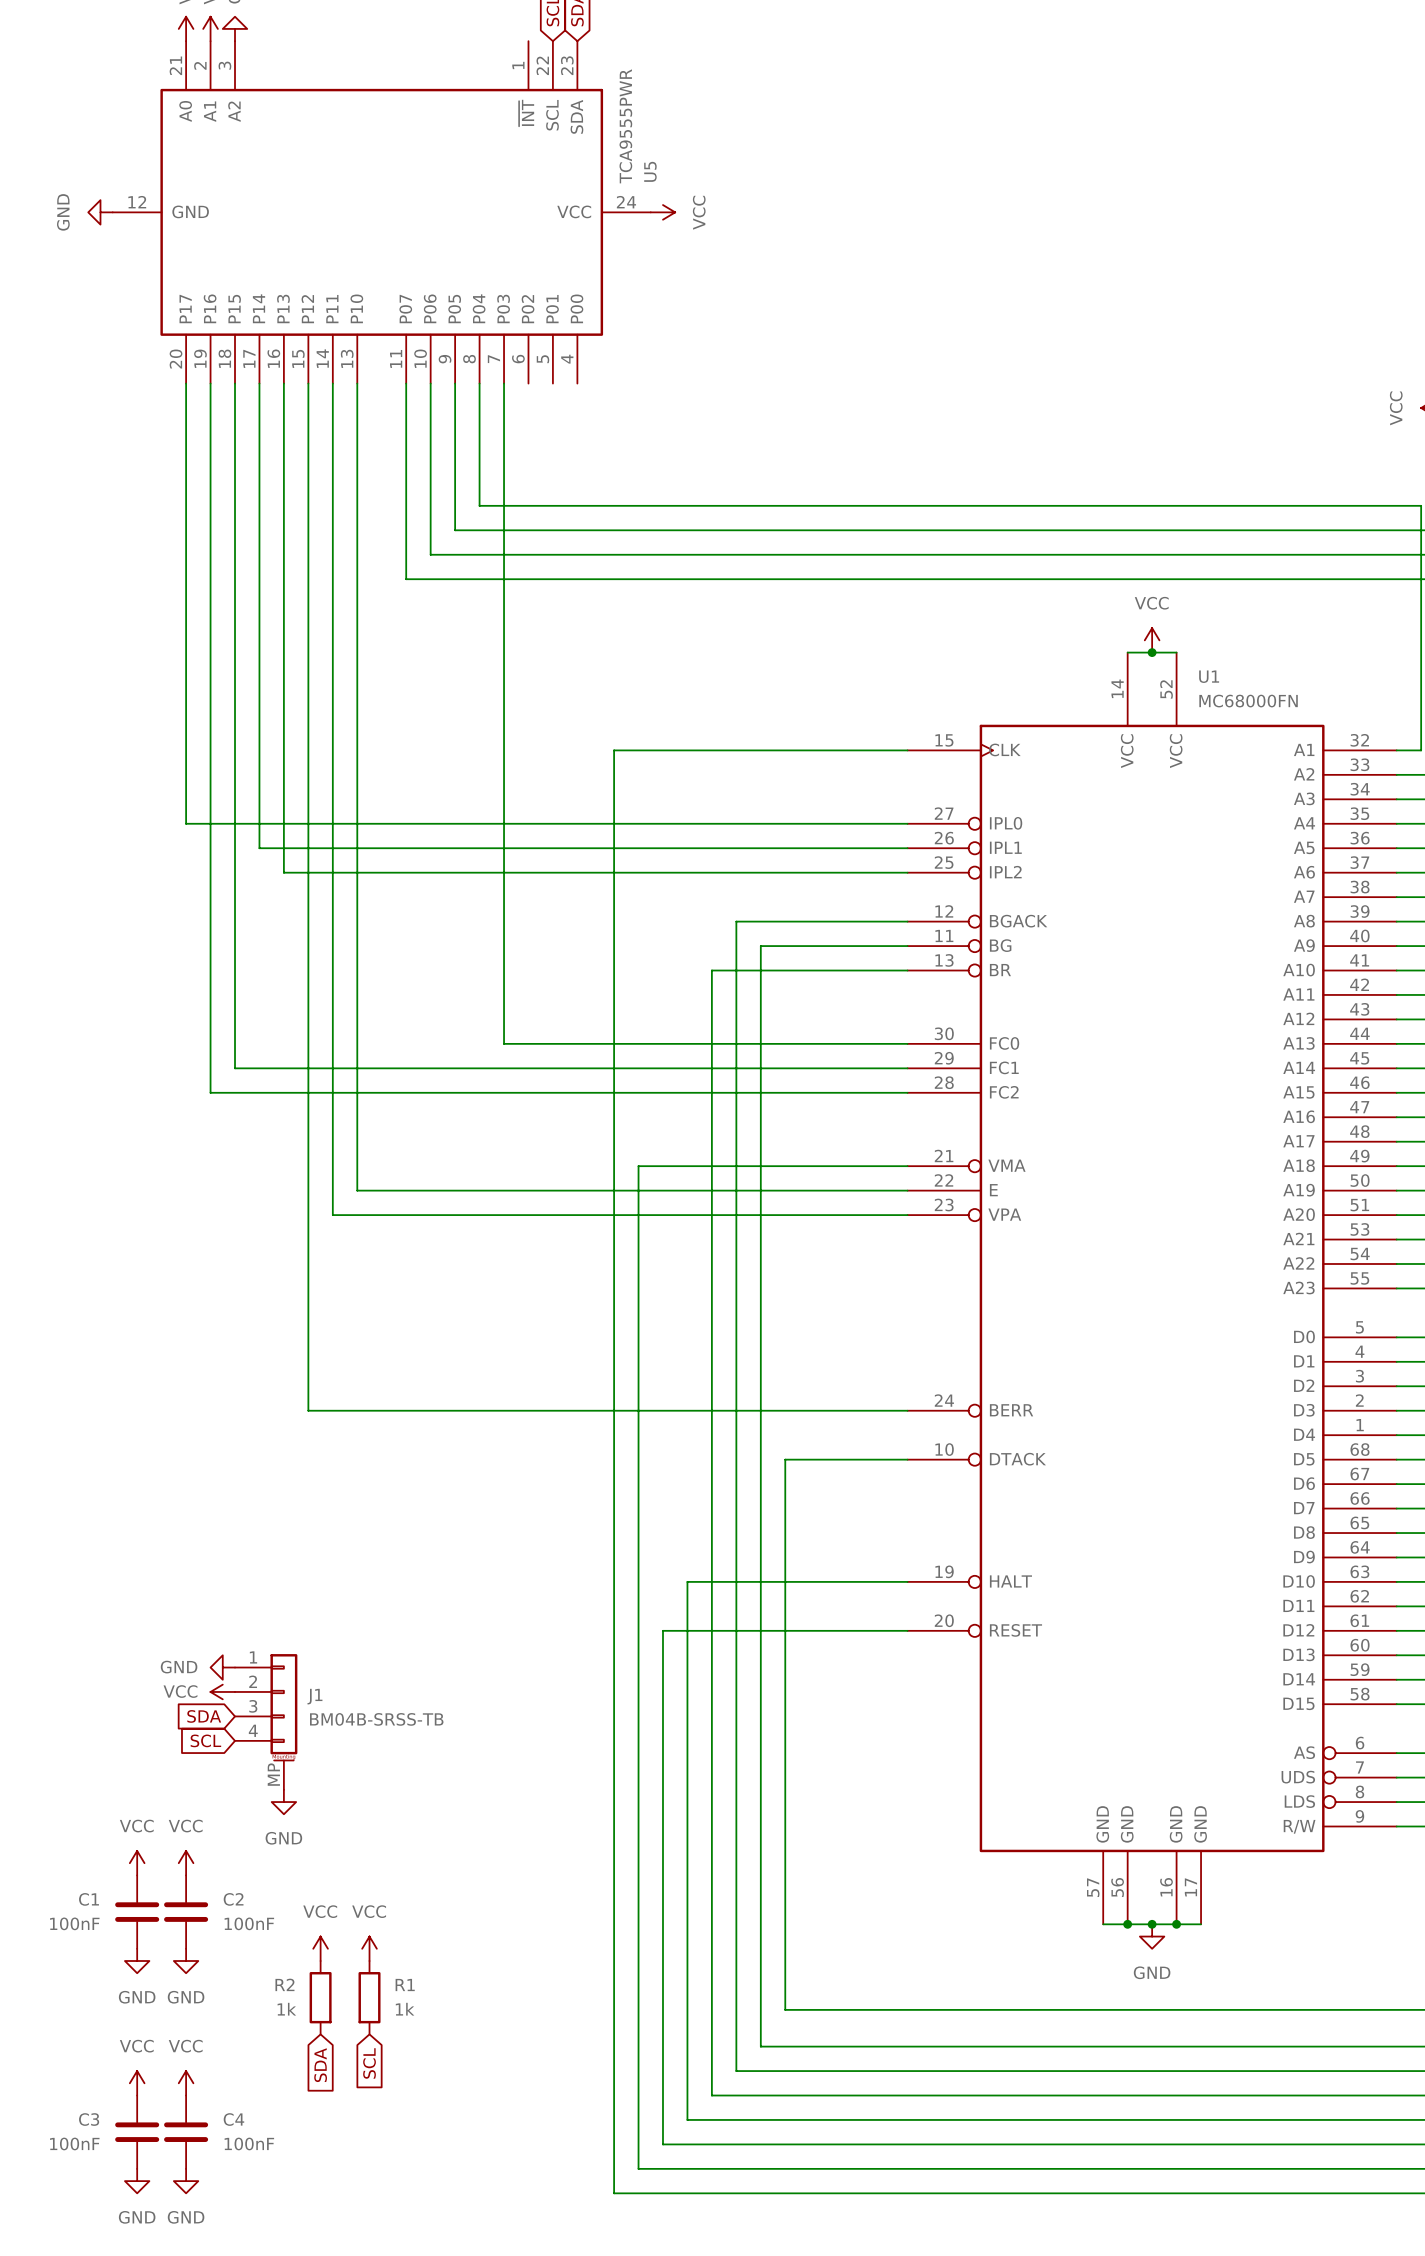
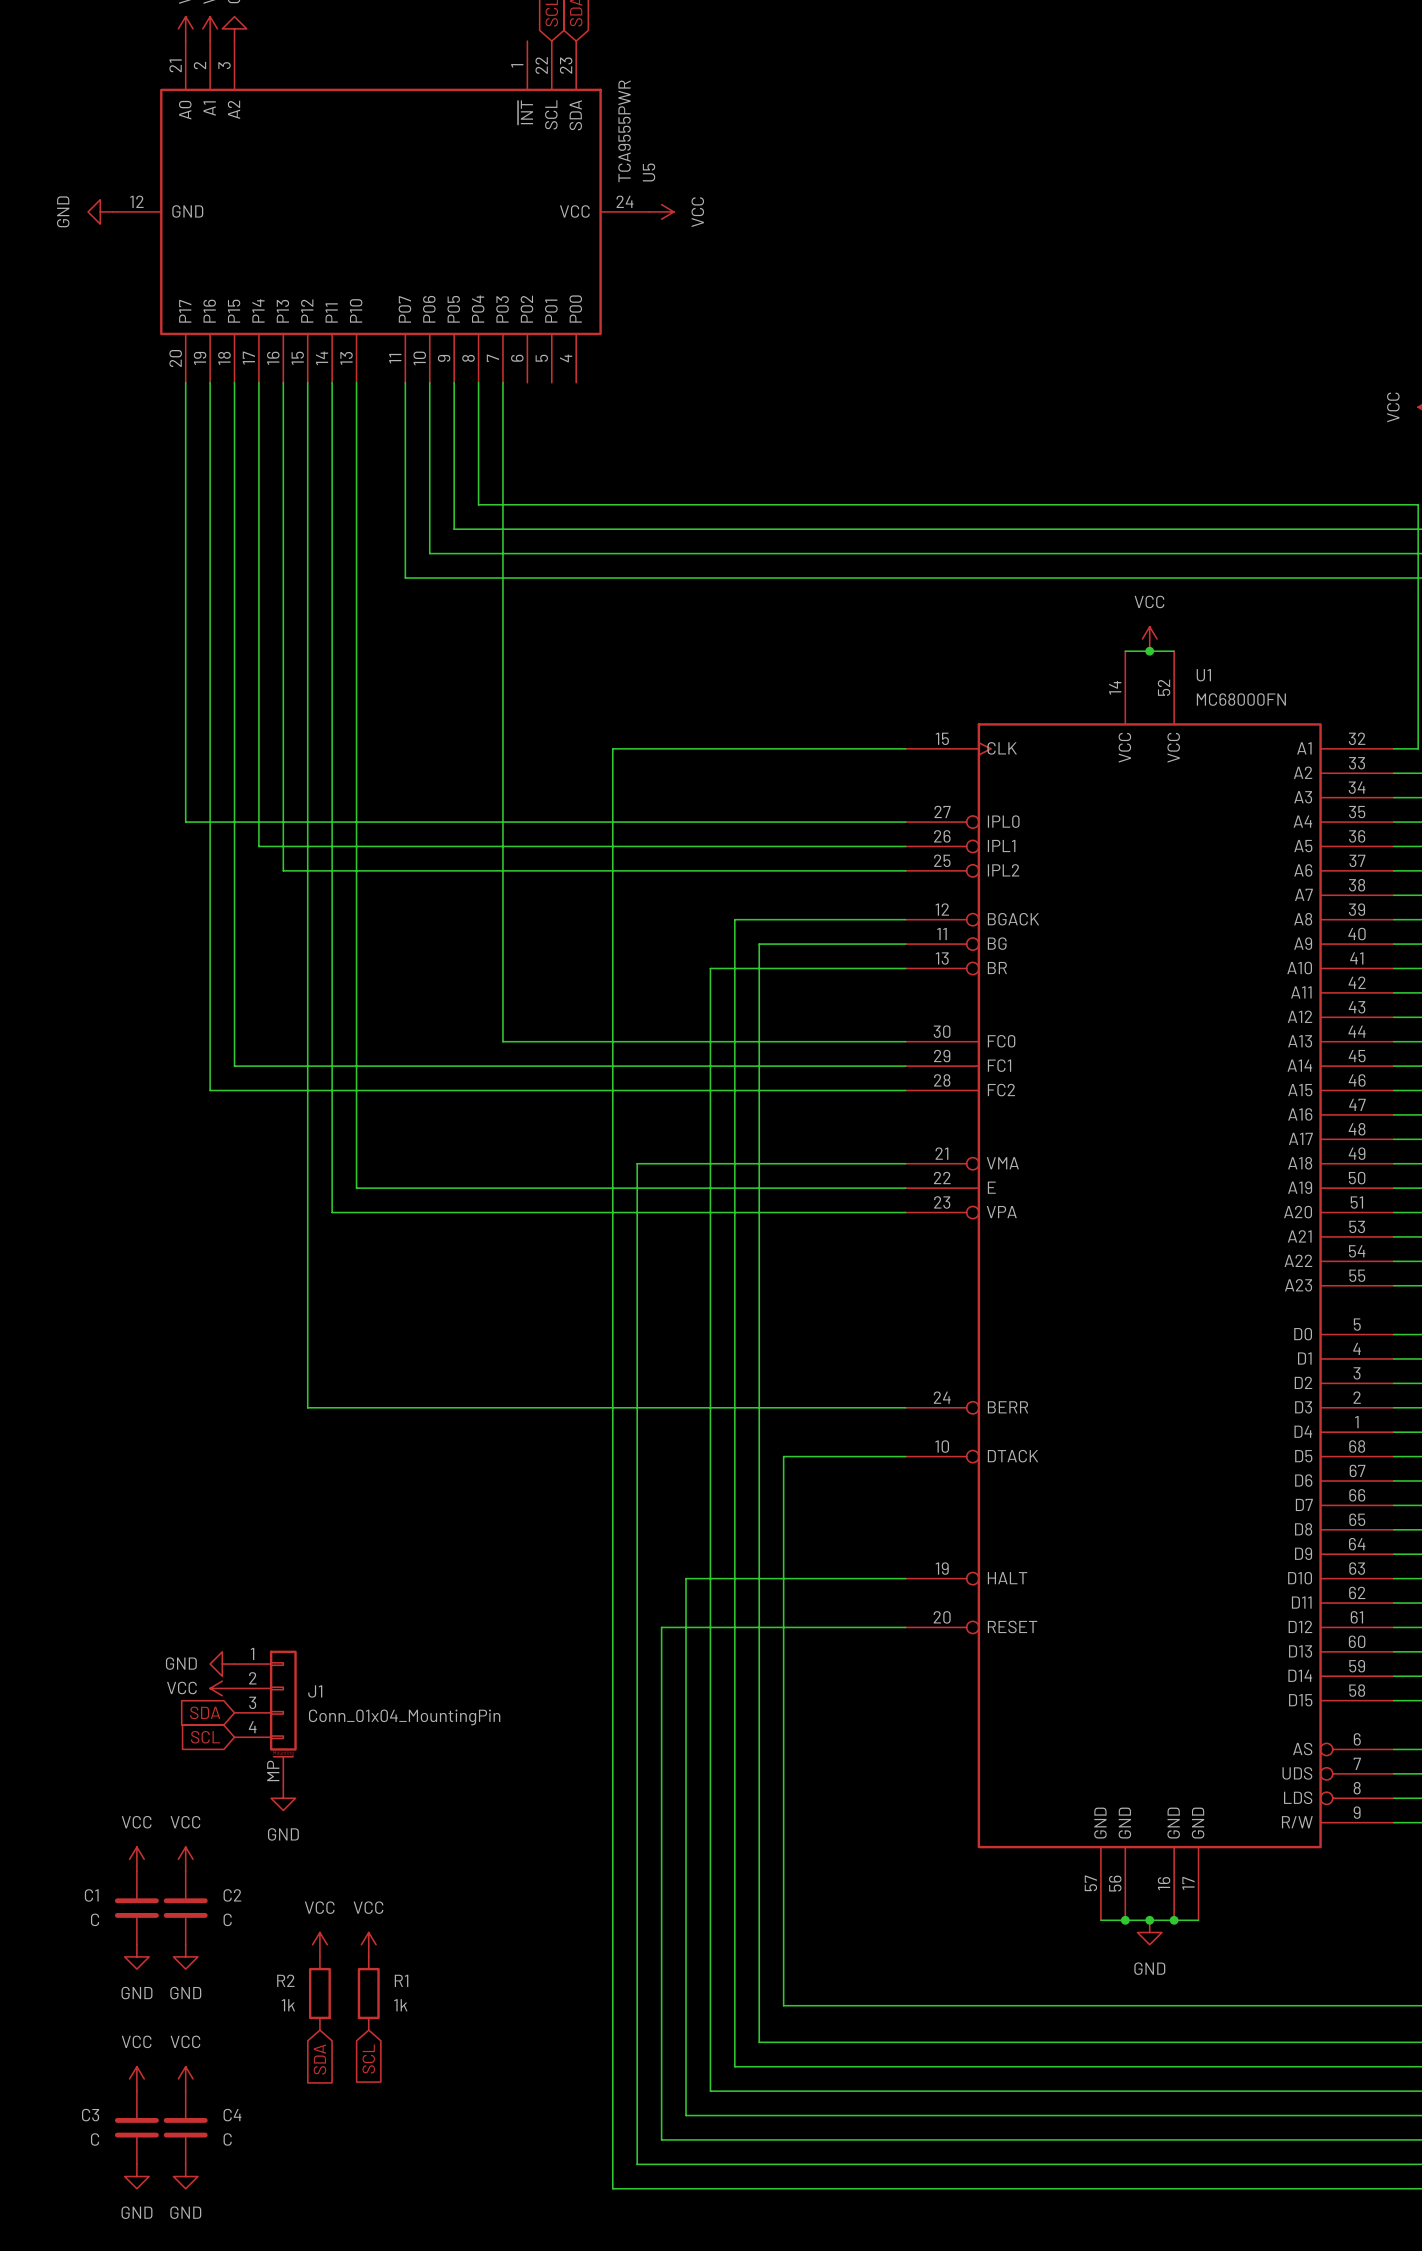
J1 value: BM04B-SRSS-TB (376, 1719) -> Conn_01x04_MountingPin (404, 1717)
C1 value: 100nF (74, 1923) -> C (95, 1919)
C2 value: 100nF (249, 1923) -> C (227, 1919)
C3 value: 100nF (74, 2143) -> C (95, 2139)
C4 value: 100nF (249, 2143) -> C (227, 2139)

